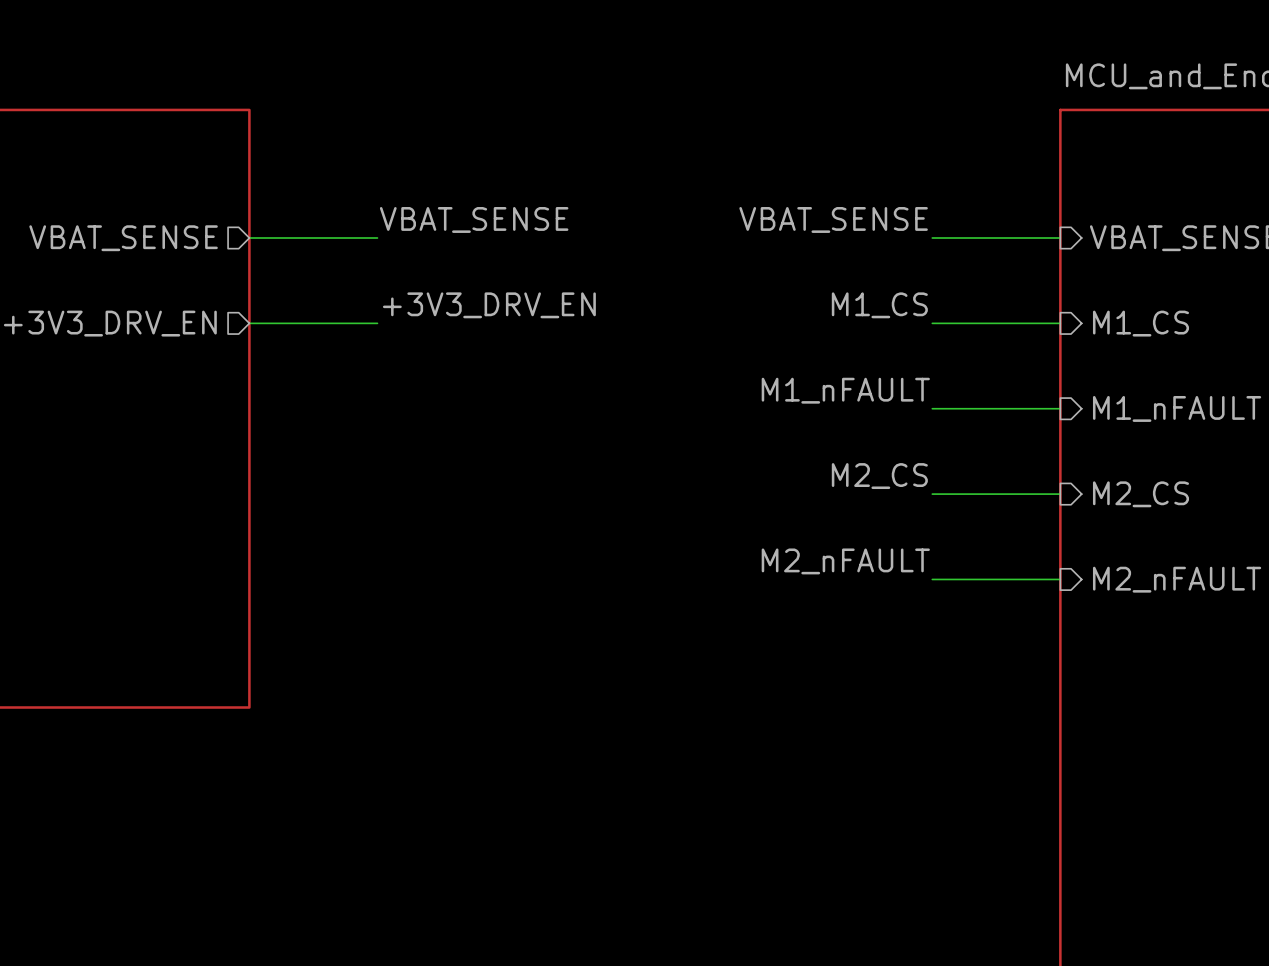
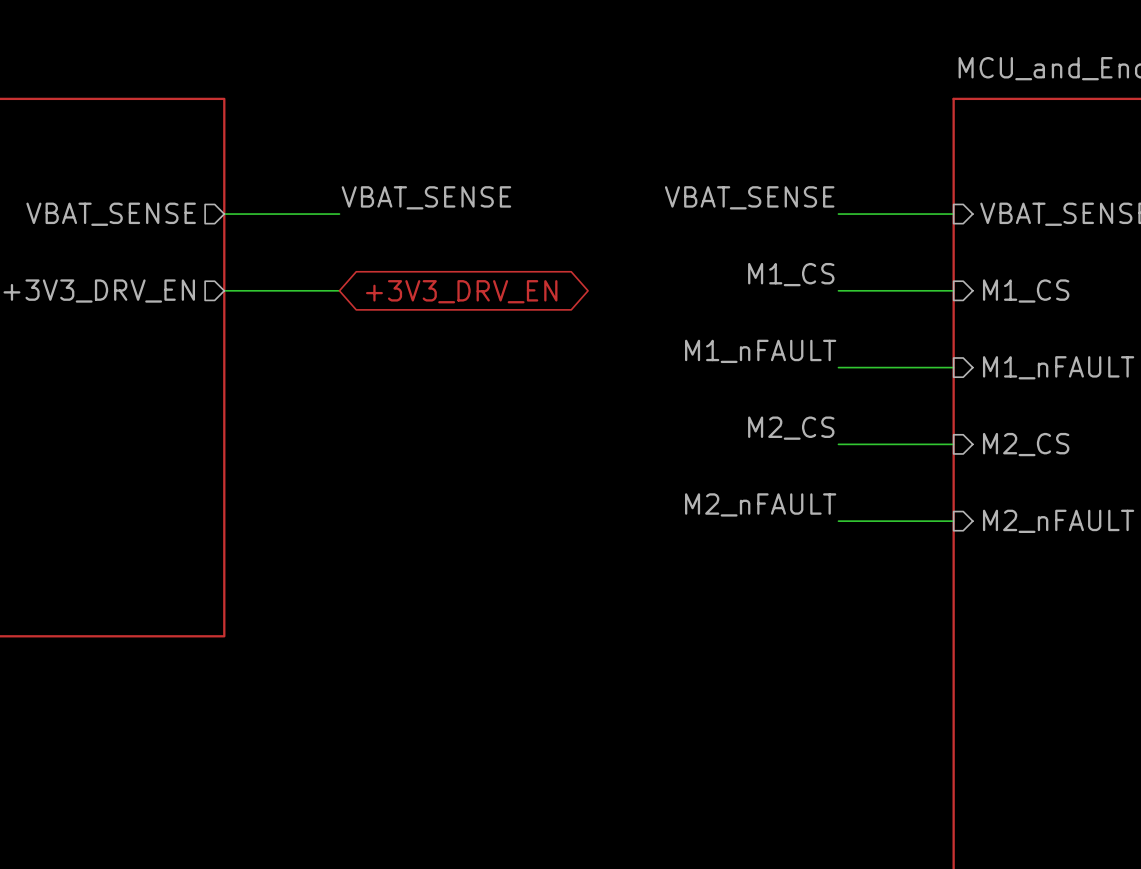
label: +3V3_DRV_EN (489, 305) -> none
global label: none -> +3V3_DRV_EN (461, 291)

